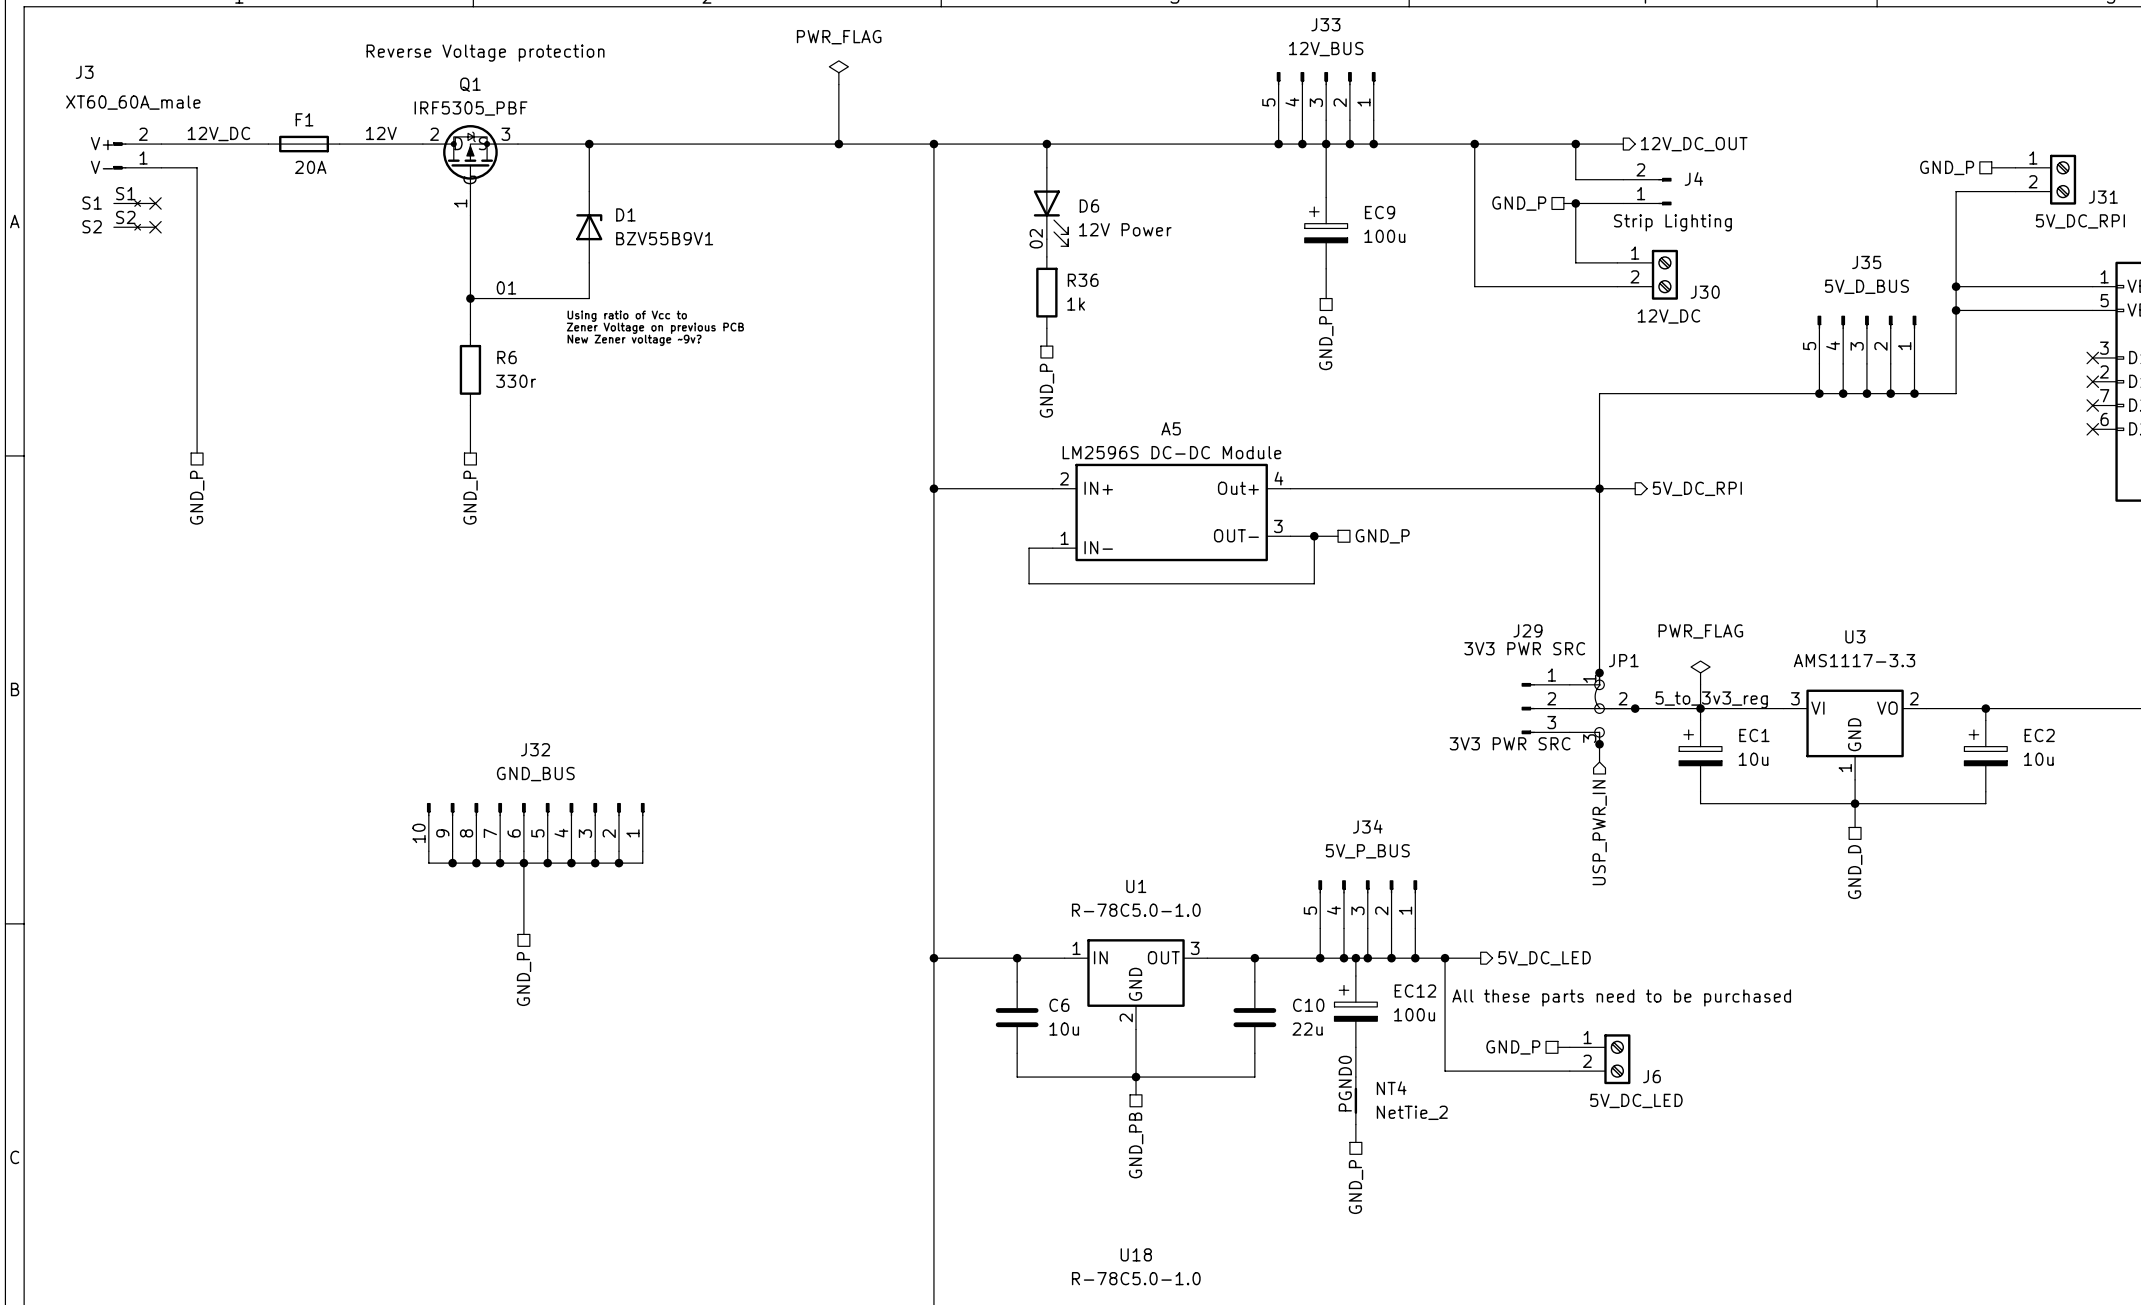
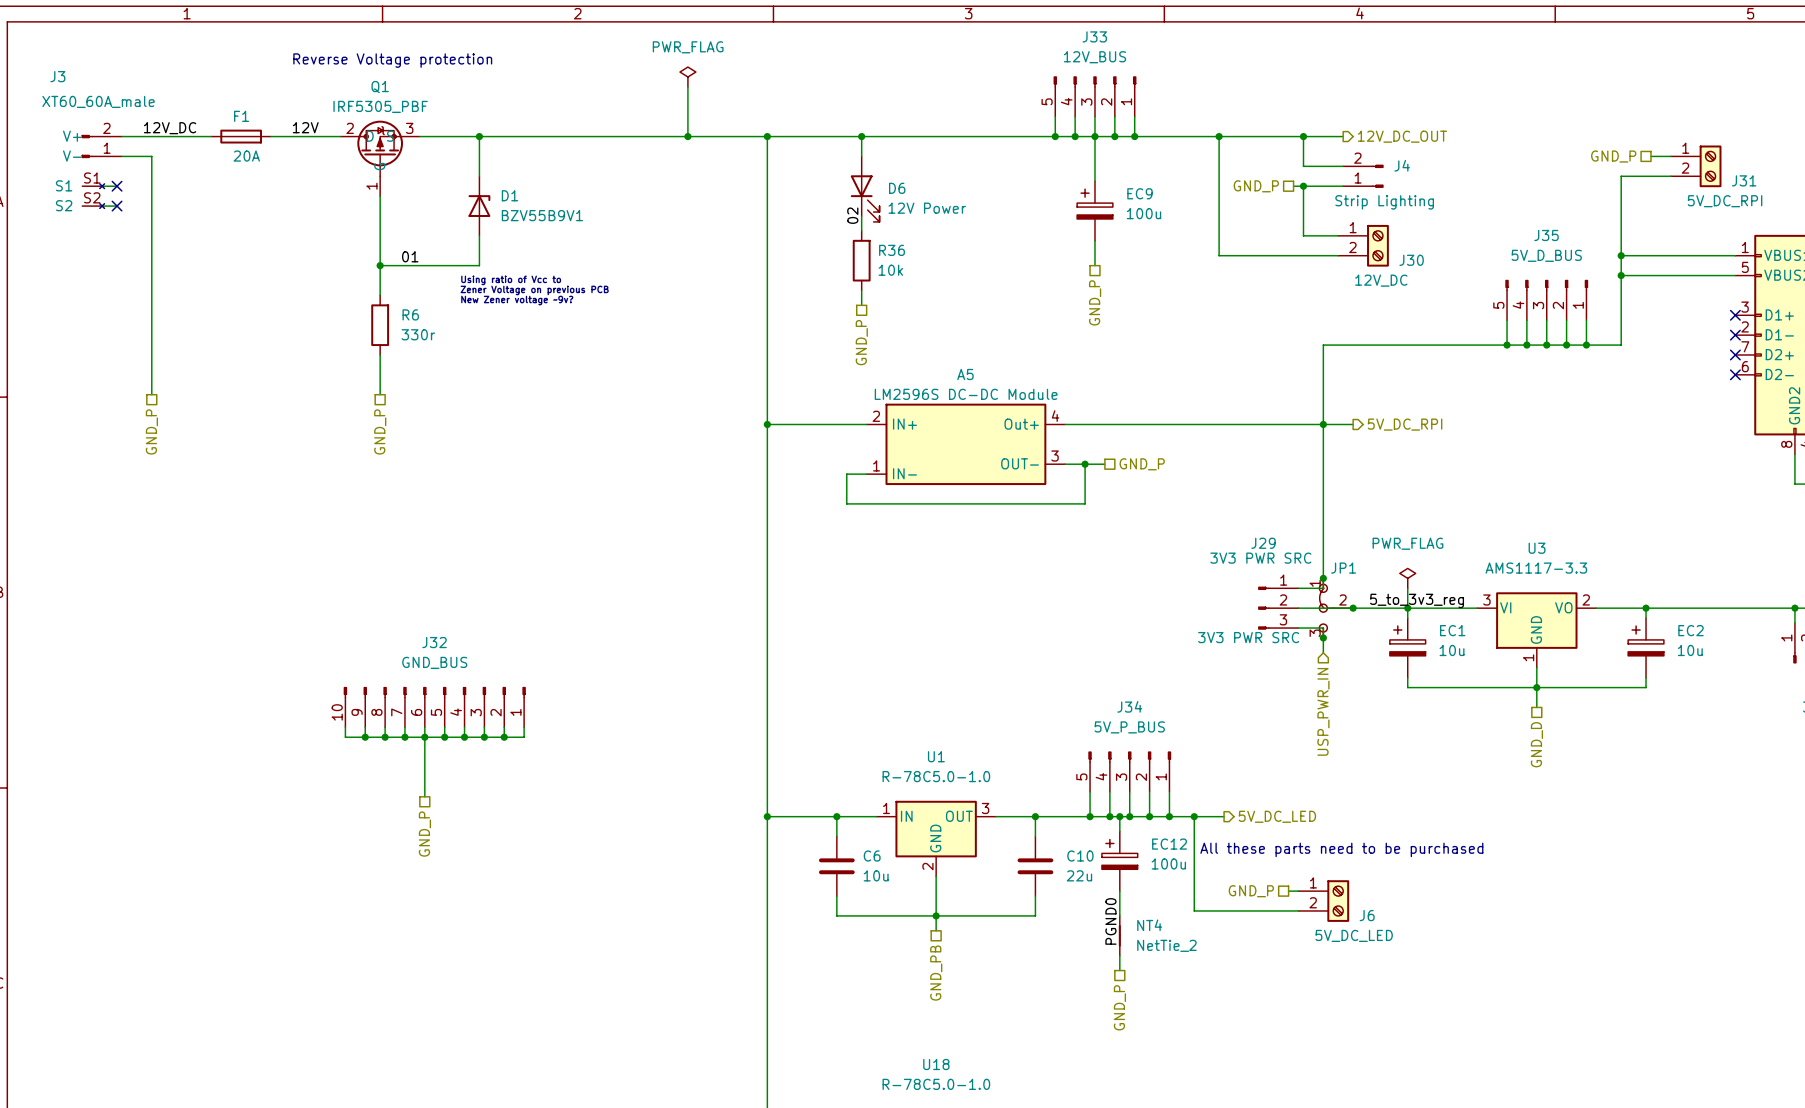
R36 value: 1k (1076, 304) -> 10k (890, 270)

